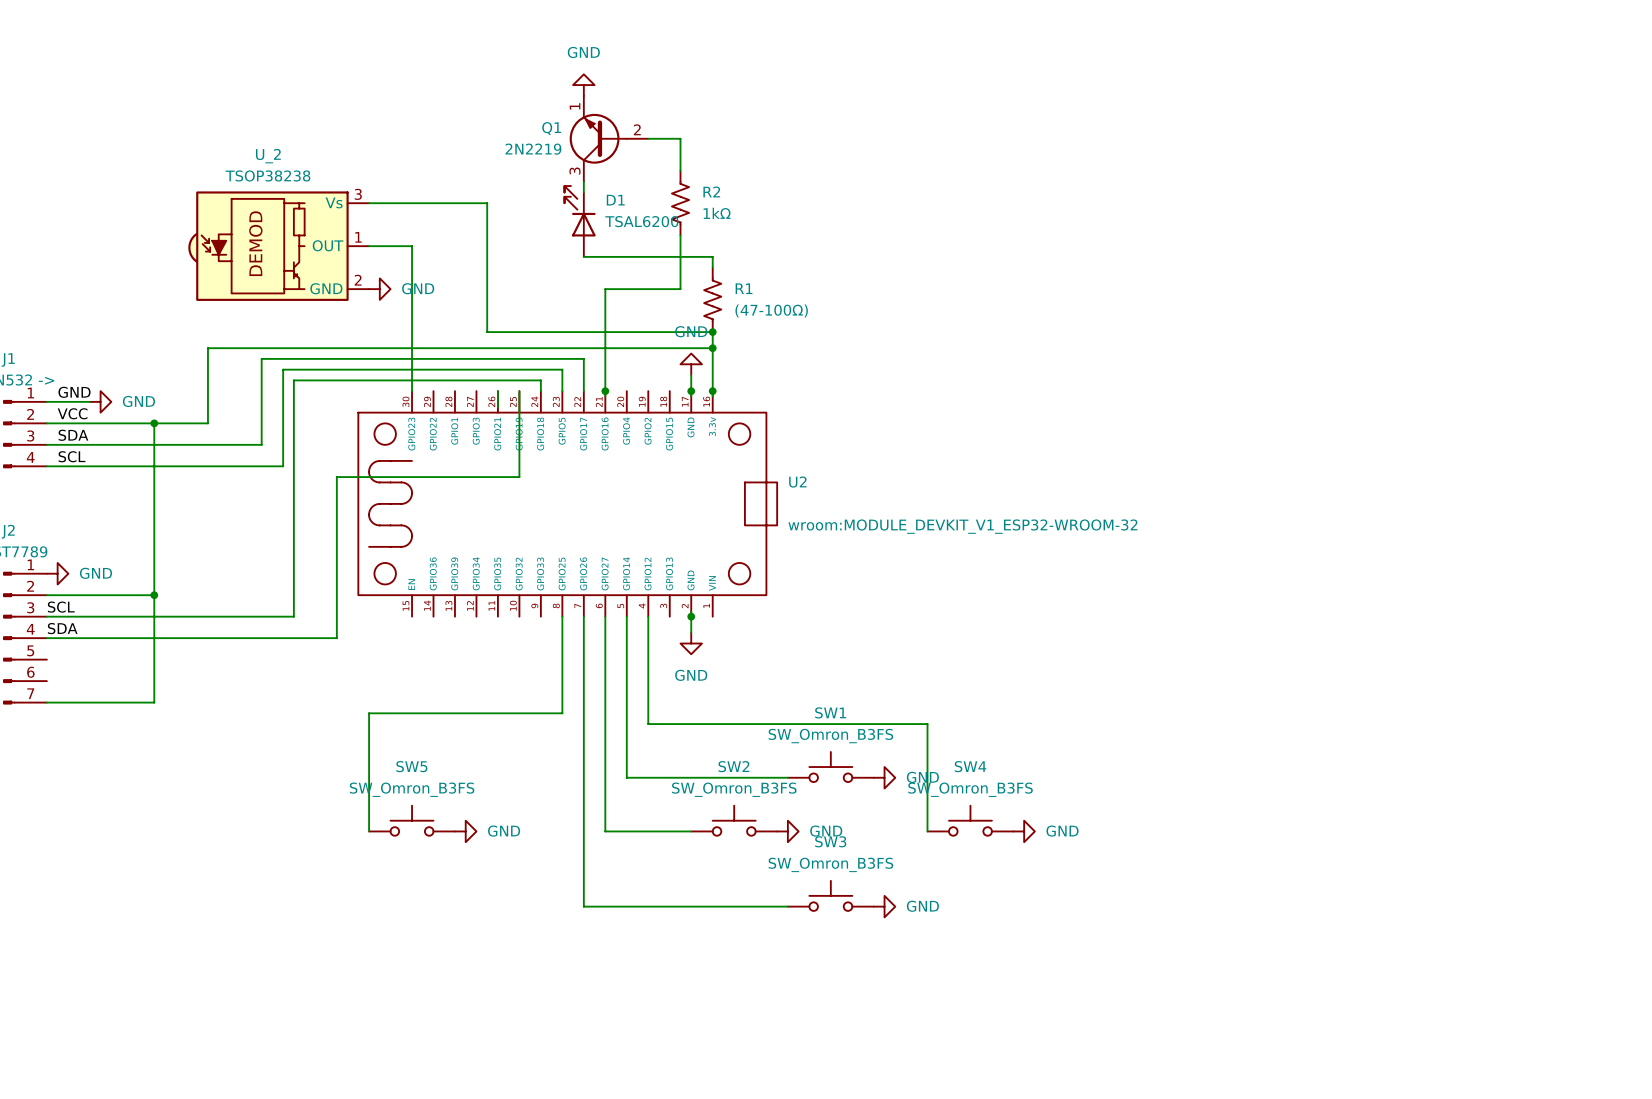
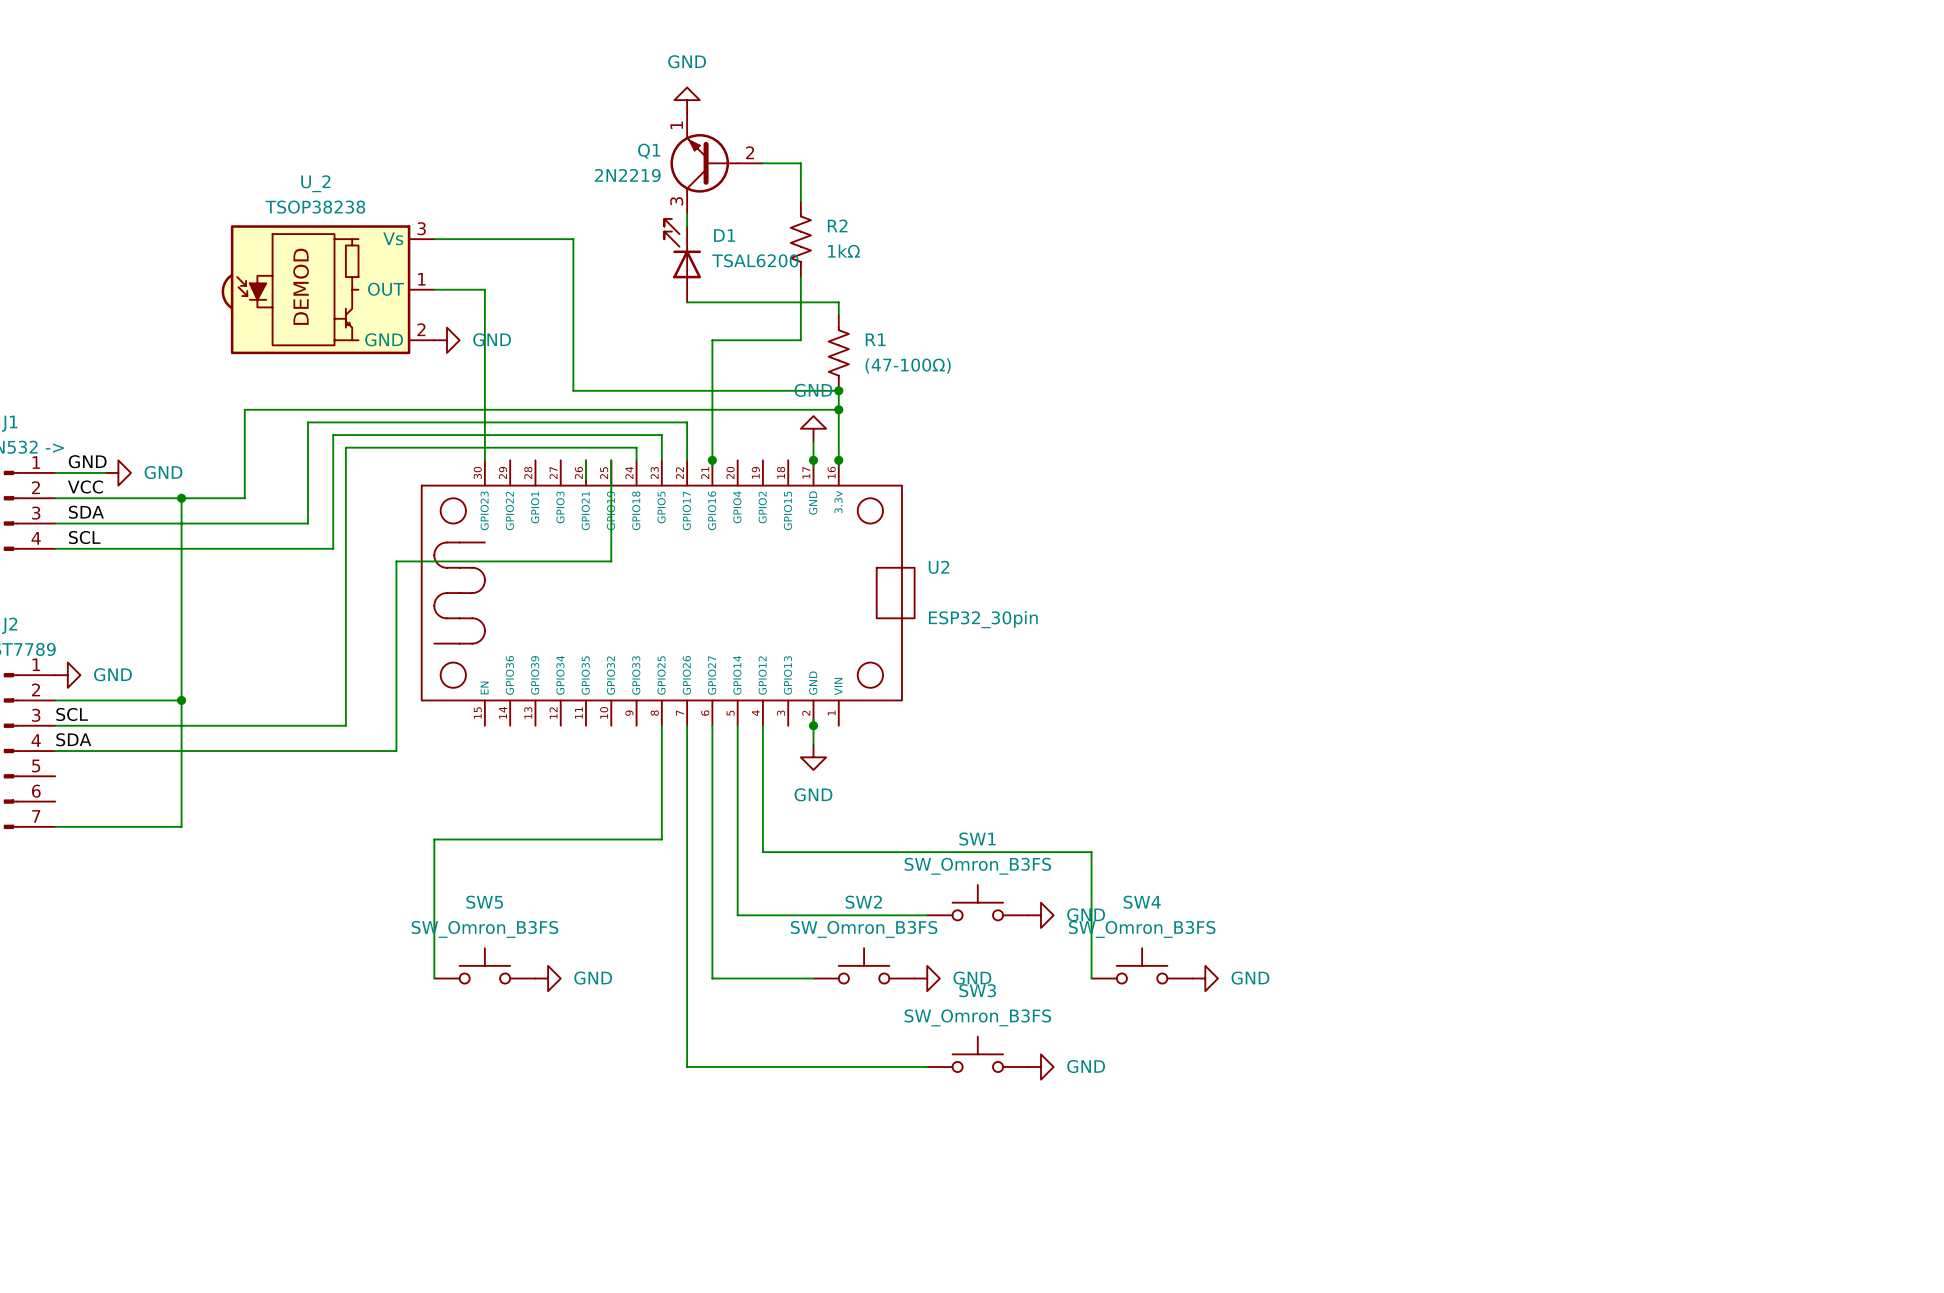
U2 text: wroom:MODULE_DEVKIT_V1_ESP32-WROOM-32 (962, 526) -> ESP32_30pin (983, 619)

